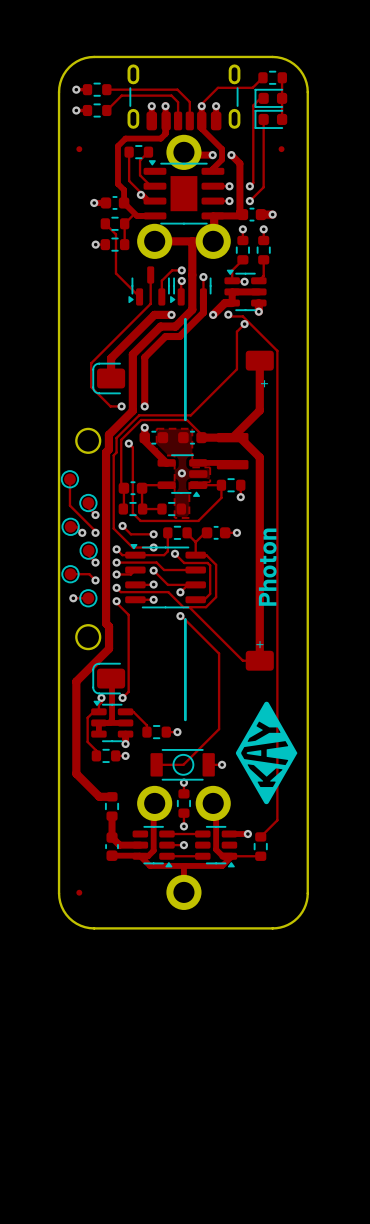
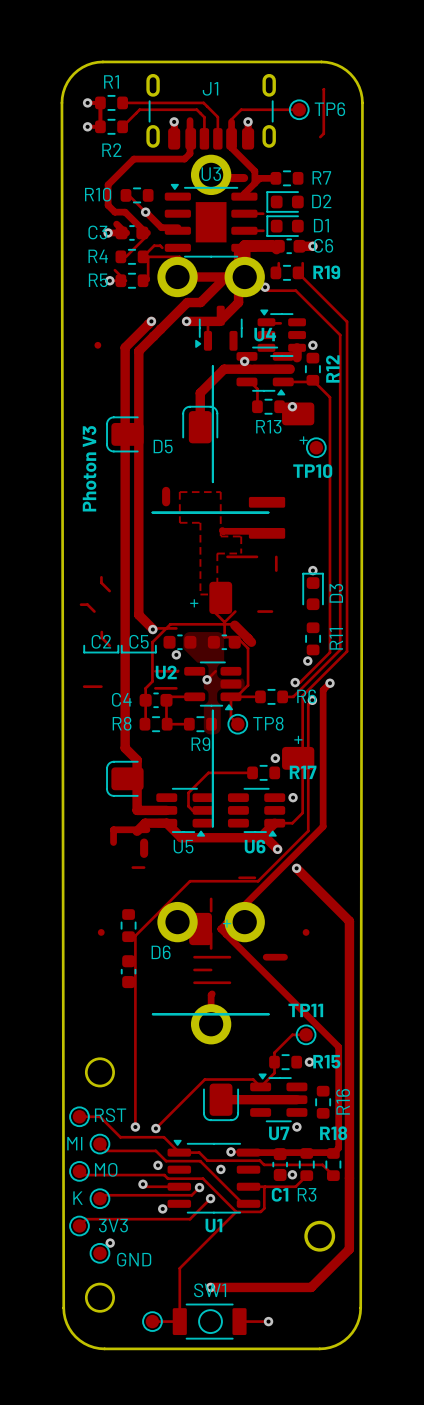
board edge: (94, 56) (277, 57) (294, 64) (300, 70) (306, 82) (307, 893) (305, 904) (300, 915) (291, 923) (280, 927) (89, 928) (80, 925) (69, 918) (60, 902) (59, 92) (61, 78) (69, 67) (80, 59) (94, 56) -> (102, 61) (87, 65) (73, 73) (65, 87) (61, 102) (64, 1313) (69, 1328) (75, 1336) (84, 1343) (99, 1348) (325, 1348) (335, 1345) (348, 1336) (357, 1323) (360, 1307) (362, 97) (359, 87) (350, 73) (337, 65) (326, 62) (102, 61)
R1 name: none -> R1 (111, 81)
J1 name: none -> J1 (210, 88)
track: (262, 77) (252, 87) (217, 87) (210, 95) -> (299, 109) (241, 109)
part: (272, 77) -> none
TP6: none -> (299, 109)
track: (263, 98) (260, 98) (253, 105) (253, 182) (249, 186) -> none
part: (270, 98) -> none
via: (165, 106) -> none
via: (201, 106) -> none
track: (263, 119) (263, 187) (249, 201) -> none
part: (270, 119) -> none
R2 name: none -> R2 (111, 150)
track: (125, 138) (117, 146) (117, 183) (124, 190) (124, 202) (137, 215) (154, 215) -> (144, 159) (133, 159) (108, 184) (108, 205) (114, 212) (125, 212) (147, 232) (147, 235) (125, 256)
part: (79, 149) -> none
part: (281, 149) -> none
U3 name: none -> U3 (211, 174)
track: (129, 152) (129, 180) (148, 201) (154, 201) -> none
part: (138, 152) -> none
track: (145, 152) (145, 155) (140, 160) (140, 175) (150, 186) (154, 186) -> none
via: (212, 155) -> none
track: (231, 155) (239, 163) (239, 211) (242, 214) -> none
via: (231, 155) -> none
track: none -> (275, 178) (259, 178) (254, 183)
R7: none -> (287, 178)
track: none -> (125, 195) (128, 195) (161, 227) (178, 227)
R10: none -> (137, 195)
D2: none -> (285, 201)
via: (229, 186) -> none
via: (249, 186) -> none
via position: (140, 194) -> (145, 212)
track: none -> (116, 224) (126, 232)
D1: none -> (285, 226)
via: (229, 201) -> none
via: (249, 201) -> none
C3 name: none -> C3 (97, 232)
C6 name: none -> C6 (323, 245)
track: none -> (276, 249) (271, 244) (244, 244) (238, 250) (238, 302) (219, 321) (186, 321)
R4 name: none -> R4 (98, 256)
track: (105, 223) (115, 234) (115, 273) (139, 296) -> none
track: (124, 223) (124, 244) -> (100, 102) (100, 126)
via: (242, 229) -> none
via: (263, 229) -> none
track: none -> (114, 270) (125, 280)
R19: none -> (287, 272)
track: none -> (298, 272) (347, 321) (347, 651) (302, 695) (302, 812) (292, 823) (274, 823) (260, 837)
track: none -> (200, 277) (179, 256) (148, 256) (148, 280)
track: (192, 241) (192, 309) (175, 326) (160, 326) (132, 354) (132, 410) (108, 434) (108, 449) (106, 452) (106, 623) (109, 626) -> (151, 321) (125, 347) (125, 719)
R5 name: none -> R5 (98, 280)
track: none -> (265, 287) (268, 290) (295, 290) (340, 335) (340, 649) (293, 696) (282, 696)
via: none -> (265, 287)
part: (242, 250) -> none
part: (263, 250) -> none
track: (242, 259) (232, 270) (232, 280) (229, 280) -> none
track: (263, 259) (263, 275) (261, 280) -> none
track: (181, 270) (172, 270) (161, 280) (161, 296) -> none
via: (181, 270) -> none
track: (150, 274) (150, 303) (91, 363) (91, 387) (110, 406) (121, 406) -> none
track: (203, 277) (203, 312) (179, 336) (165, 336) (144, 357) (144, 406) -> none
via: (203, 277) -> none
via: none -> (151, 321)
via: none -> (186, 321)
via: (181, 280) -> none
via: (244, 281) -> none
part: (149, 285) -> none
track: (259, 291) (232, 291) (232, 303) (225, 303) (213, 314) -> none
part: none -> (97, 345)
via: none -> (312, 345)
via: (258, 311) -> none
track: (171, 314) (154, 314) (111, 358) (111, 378) -> none
via: (171, 314) -> none
track: (228, 314) (230, 316) (242, 316) (277, 350) (277, 820) (260, 836) -> none
via: (228, 314) -> none
track: none -> (250, 369) (224, 369) (200, 393) (200, 427)
track: none -> (253, 369) (290, 369)
R12: none -> (312, 369)
U4: none -> (265, 371)
track: (244, 324) (236, 331) (236, 369) (190, 415) (139, 415) (116, 437) (116, 452) (113, 455) (113, 528) (120, 535) -> (225, 277) (200, 302) (187, 302) (138, 351) (138, 614)
via: (244, 324) -> none
track: none -> (250, 381) (257, 389) (257, 406)
track: none -> (283, 381) (312, 380) (329, 397) (329, 652) (299, 682) (295, 682)
R13: none -> (268, 406)
via: none -> (292, 406)
track: (259, 362) (259, 410) (232, 437) -> none
TP10: none -> (316, 447)
via: (121, 406) -> none
via: (144, 406) -> none
text: none -> Photon V3 (89, 468)
round board edge: [75, 427, 102, 454] -> none
via: (144, 427) -> none
track: (201, 434) (187, 420) (141, 420) (121, 439) (123, 509) -> none
part: (153, 437) -> none
part: (192, 437) -> none
track: (201, 437) (240, 437) (259, 457) (259, 660) (242, 660) (189, 607) -> none
track: (144, 441) (166, 462) -> none
track: (128, 443) (132, 447) (132, 513) (140, 520) (198, 520) (221, 497) (221, 485) -> none
via: (128, 443) -> none
D5: none -> (210, 509)
via: (181, 473) -> none
part: (182, 475) -> none
track: (69, 479) (69, 505) (94, 529) (95, 534) -> none
part: (69, 479) -> none
track: (166, 485) (145, 485) (142, 488) (142, 508) (162, 509) -> (194, 696) (169, 696) (166, 700) (166, 723) (189, 724)
part: (231, 485) -> none
part: (132, 488) -> none
via: (240, 497) -> none
via: none -> (312, 570)
part: (88, 503) -> none
part: (132, 509) -> none
part: (171, 509) -> none
via: (95, 514) -> none
D3: none -> (313, 591)
track: (122, 525) (130, 534) (153, 534) -> none
via: (122, 525) -> none
part: (70, 526) -> none
via: (82, 532) -> none
via: (95, 532) -> none
track: (167, 532) (167, 551) (164, 555) (122, 555) (116, 549) -> none
part: (177, 532) -> none
part: (216, 532) -> none
via: (236, 532) -> none
via: (153, 534) -> none
track width: thin (120, 535) (132, 547) -> thick (138, 614) (152, 628)
via: (153, 547) -> none
via: none -> (152, 629)
via: (116, 549) -> none
part: (88, 550) -> none
track: (175, 553) (184, 562) (207, 562) (210, 565) (210, 593) (204, 599) (195, 599) -> none
via: (175, 553) -> none
R11: none -> (313, 638)
C2: none -> (179, 642)
C5: none -> (224, 642)
track: none -> (251, 642) (233, 624) (170, 624) (152, 642) (152, 681) (145, 688) (144, 724)
line: none -> (84, 645) (84, 652) (118, 652) (118, 645)
via: (95, 562) -> none
line: none -> (121, 645) (121, 652) (155, 652) (155, 645)
track: (116, 562) (156, 562) (164, 570) (195, 570) -> none
via: (116, 562) -> none
text: Photon (267, 567) -> none
track: (135, 570) (130, 574) (116, 574) -> none
track: (152, 570) (167, 584) (195, 584) -> none
track: (70, 574) (89, 574) (95, 580) -> none
part: (70, 574) -> none
via: (116, 574) -> none
via: none -> (307, 661)
part: (165, 576) -> none
via: (95, 580) -> none
via: (153, 584) -> none
track: (116, 587) (120, 592) (168, 592) (183, 607) (201, 607) -> (237, 724) (230, 717) (230, 696)
via: (116, 587) -> none
via: none -> (295, 682)
track: none -> (329, 683) (323, 690) (323, 826) (220, 929) (338, 1046) (338, 1148) (333, 1153) (230, 1151)
via: none -> (329, 683)
U2: none -> (212, 685)
via: (73, 598) -> none
part: (88, 598) -> none
via: (153, 599) -> none
track: (116, 601) (128, 614) (128, 691) (122, 697) -> none
via: (116, 601) -> none
R6: none -> (271, 696)
C4: none -> (156, 700)
track: none -> (312, 700) (308, 704) (308, 831) (258, 881) (190, 881) (135, 935) (135, 1127)
via: none -> (312, 700)
track: (180, 616) (219, 653) (219, 729) (183, 764) (156, 764) -> none
via: (180, 616) -> none
round board edge: [75, 624, 102, 651] -> none
R8: none -> (156, 724)
R9: none -> (200, 724)
TP8: none -> (237, 724)
track: (109, 648) (76, 681) (76, 773) (99, 796) (112, 796) -> (125, 744) (125, 748) (137, 760) (137, 767)
via: none -> (275, 758)
track: none -> (252, 772) (208, 772) (188, 792) (188, 806) (192, 810) (203, 810)
R17: none -> (263, 772)
track: (111, 678) (112, 720) (109, 722) -> none
track: none -> (137, 789) (137, 810) (166, 810)
via: none -> (293, 797)
track: (101, 697) (101, 702) (96, 711) -> none
via: (101, 697) -> none
via: (122, 697) -> none
drawing: [235, 701, 298, 805] -> none
U5: none -> (184, 812)
U6: none -> (256, 812)
track: (98, 711) (93, 711) (87, 717) (87, 741) (96, 750) (96, 755) (93, 758) -> none
track: (128, 711) (133, 711) (146, 725) (146, 732) -> none
part: (112, 721) -> none
track: none -> (137, 831) (145, 823) (166, 823) (181, 837) (266, 837) (277, 849)
part: (156, 732) -> none
via: (177, 732) -> none
via: none -> (277, 849)
via: (125, 744) -> none
part: (106, 755) -> none
via: (125, 755) -> none
track: none -> (296, 868) (349, 921) (349, 1249) (311, 1287) (210, 1287)
via: none -> (296, 868)
part: (182, 764) -> none
via: (222, 764) -> none
via: (183, 782) -> none
track: (154, 803) (153, 850) (148, 856) (140, 856) -> none
part: (183, 803) -> none
track: (213, 803) (216, 806) (216, 849) (222, 856) (231, 856) -> none
part: none -> (306, 932)
track: (112, 817) (112, 837) (119, 845) (140, 845) -> none
via: (183, 826) -> none
via: (247, 834) -> none
via: (183, 845) -> none
part: (153, 846) -> none
part: (216, 846) -> none
part: (260, 846) -> none
track: (231, 856) (260, 856) -> none
track: (231, 856) (222, 865) (150, 865) (139, 855) (112, 855) (112, 857) -> none
D6: none -> (210, 1016)
part position: (79, 892) -> (101, 932)
track: none -> (306, 1034) (292, 1034) (274, 1052) (274, 1073) (260, 1086) (253, 1079) (204, 1079) (155, 1128)
TP11: none -> (306, 1034)
round board edge: none -> [84, 1057, 115, 1088]
R15: none -> (285, 1062)
via: none -> (309, 1062)
U7: none -> (278, 1097)
track: none -> (221, 1099) (296, 1099)
R16: none -> (323, 1102)
text: none -> RST (110, 1115)
track: none -> (79, 1116) (99, 1116) (120, 1137) (163, 1137) (179, 1152) (199, 1152) (207, 1160) (259, 1160) (264, 1164) (322, 1164) (333, 1175)
part: none -> (79, 1116)
via: none -> (135, 1127)
via: none -> (296, 1127)
via: none -> (155, 1128)
text: none -> MI (74, 1143)
track: none -> (99, 1144) (106, 1150) (155, 1150) (166, 1161) (200, 1161) (242, 1203) (248, 1203)
part: none -> (99, 1144)
via: none -> (230, 1151)
C1: none -> (280, 1164)
R3: none -> (306, 1164)
R18: none -> (333, 1164)
via: none -> (157, 1165)
via: none -> (220, 1169)
text: none -> MO (106, 1169)
track: none -> (79, 1171) (83, 1175) (164, 1175) (167, 1178) (202, 1178) (236, 1211)
part: none -> (79, 1171)
via: none -> (292, 1174)
track: none -> (306, 1175) (295, 1186) (248, 1186)
U1: none -> (213, 1176)
track: none -> (142, 1184) (145, 1186) (179, 1186)
via: none -> (142, 1184)
track: none -> (265, 1186) (264, 1208) (260, 1211) (236, 1211)
track: none -> (199, 1187) (191, 1195) (103, 1195) (99, 1198)
via: none -> (199, 1187)
text: none -> K (78, 1198)
part: none -> (99, 1198)
track: none -> (210, 1198) (190, 1219) (86, 1219) (79, 1226)
via: none -> (210, 1198)
via: none -> (162, 1208)
track: none -> (236, 1211) (179, 1268) (179, 1321) (152, 1321)
text: none -> 3V3 (113, 1225)
part: none -> (79, 1226)
part: none -> (319, 1236)
via: none -> (110, 1243)
part: none -> (99, 1253)
text: none -> GND (134, 1259)
round board edge: none -> [84, 1282, 115, 1313]
via: none -> (210, 1287)
part: none -> (152, 1321)
SW1: none -> (209, 1321)
track: none -> (239, 1321) (268, 1321)
via: none -> (268, 1321)

